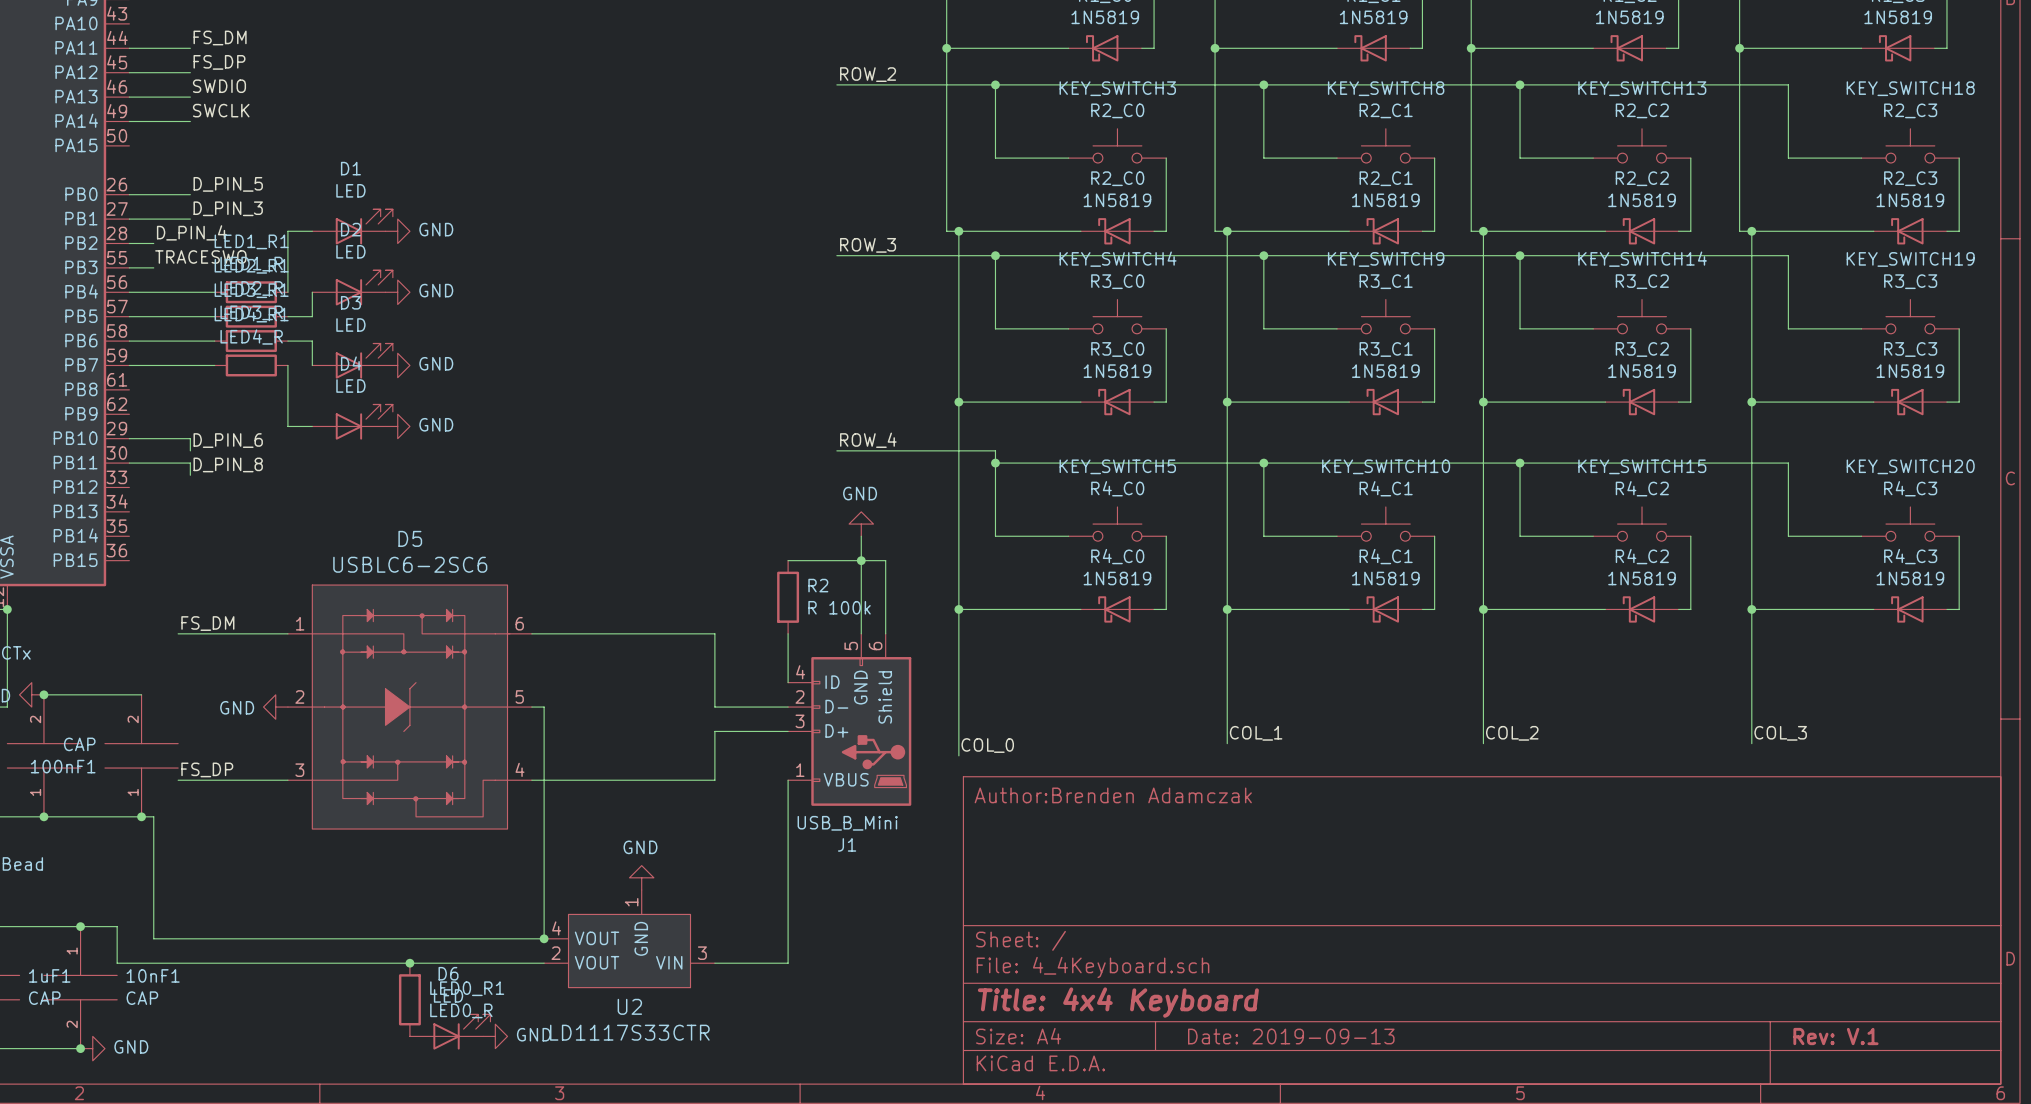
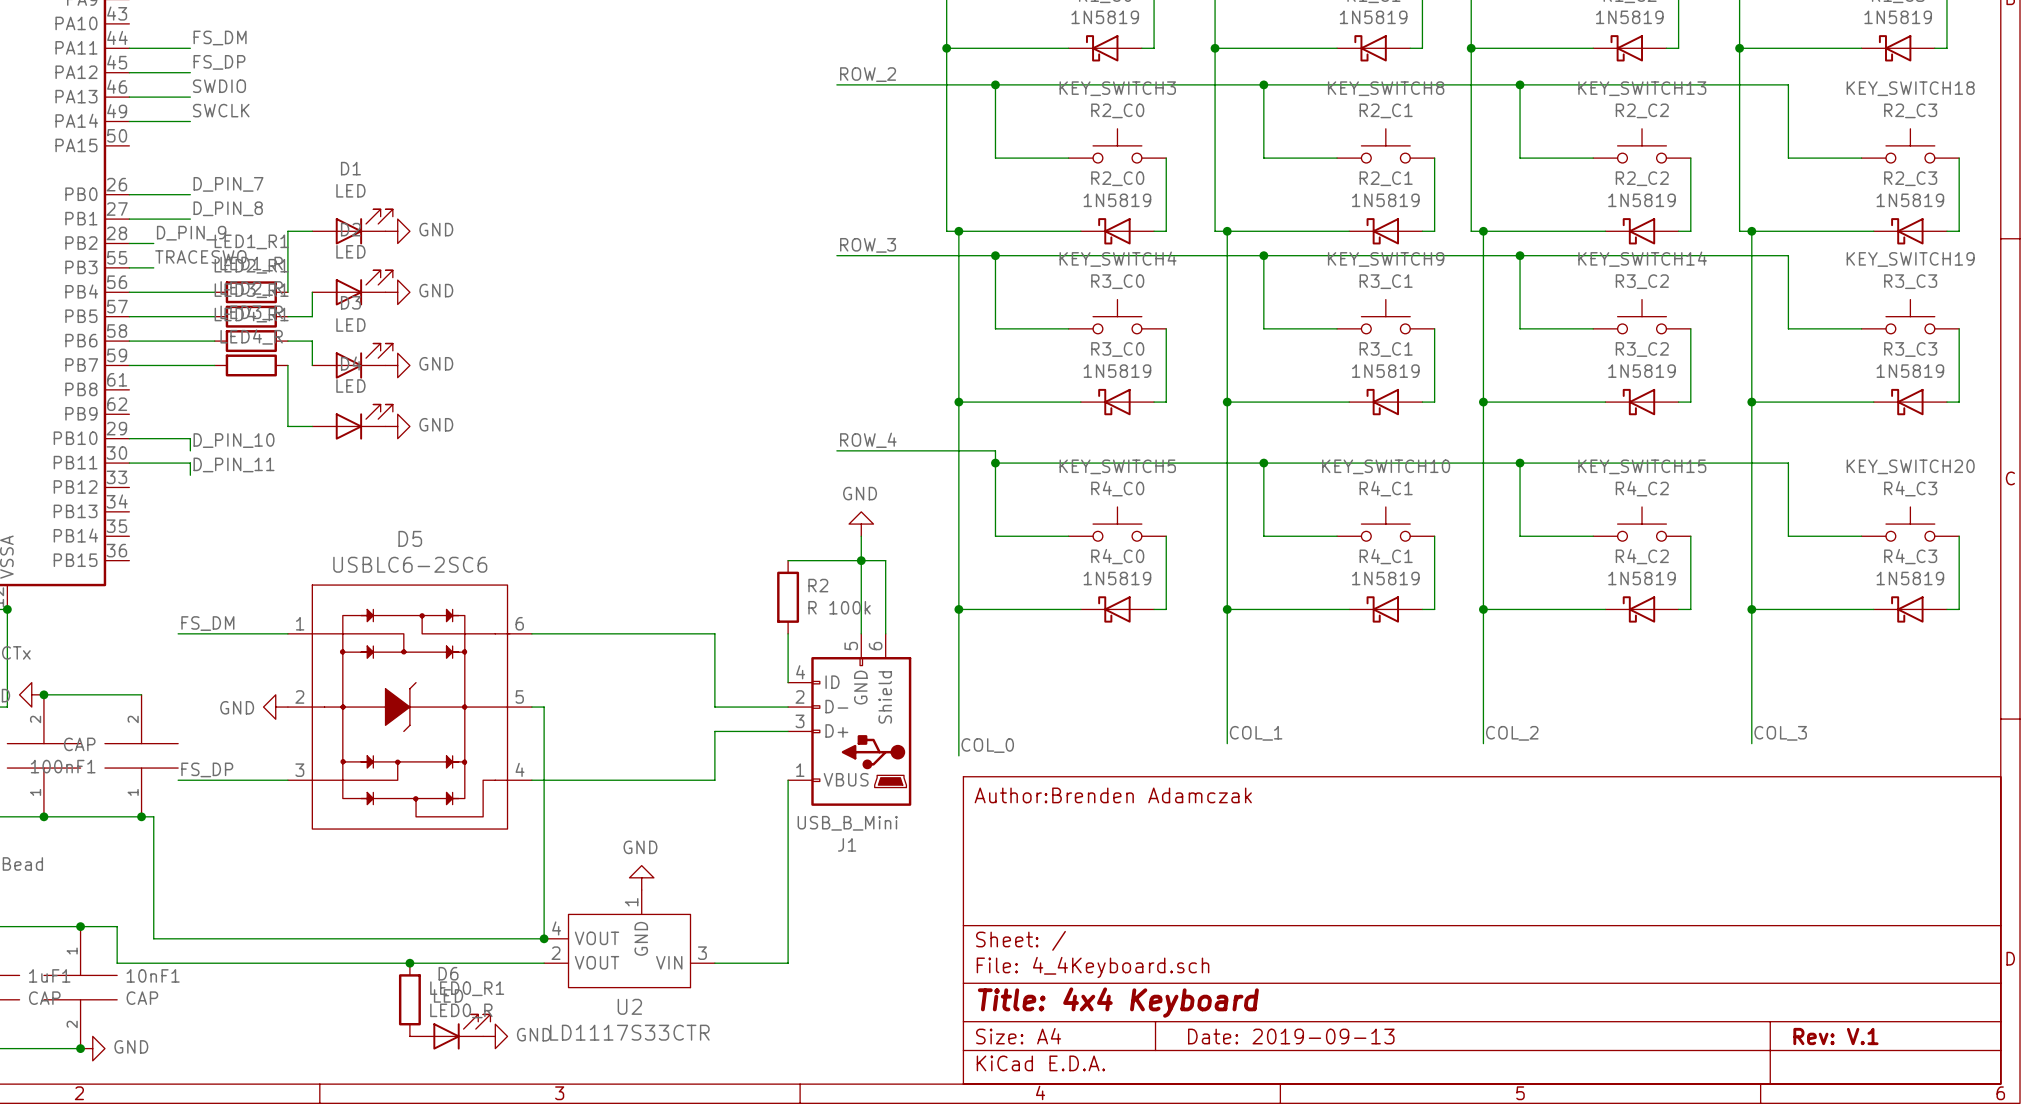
label: D_PIN_5 (228, 184) -> D_PIN_7 (228, 184)
label: D_PIN_3 (228, 208) -> D_PIN_8 (228, 208)
label: D_PIN_4 (191, 232) -> D_PIN_9 (191, 233)
label: D_PIN_6 (228, 440) -> D_PIN_10 (234, 440)
label: D_PIN_8 (228, 464) -> D_PIN_11 (234, 464)

